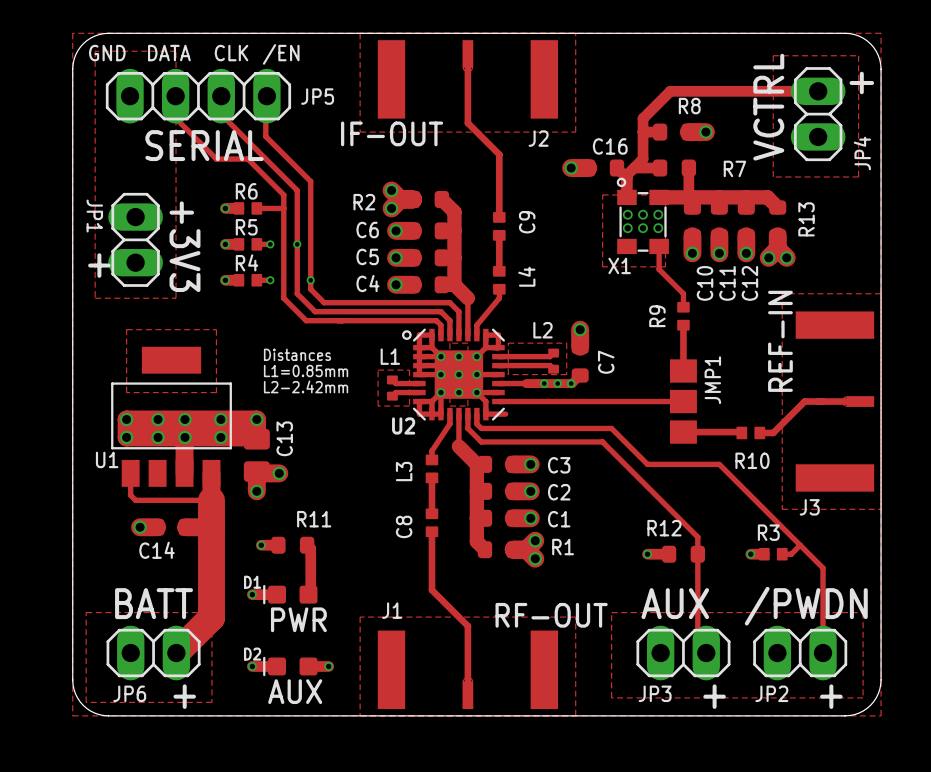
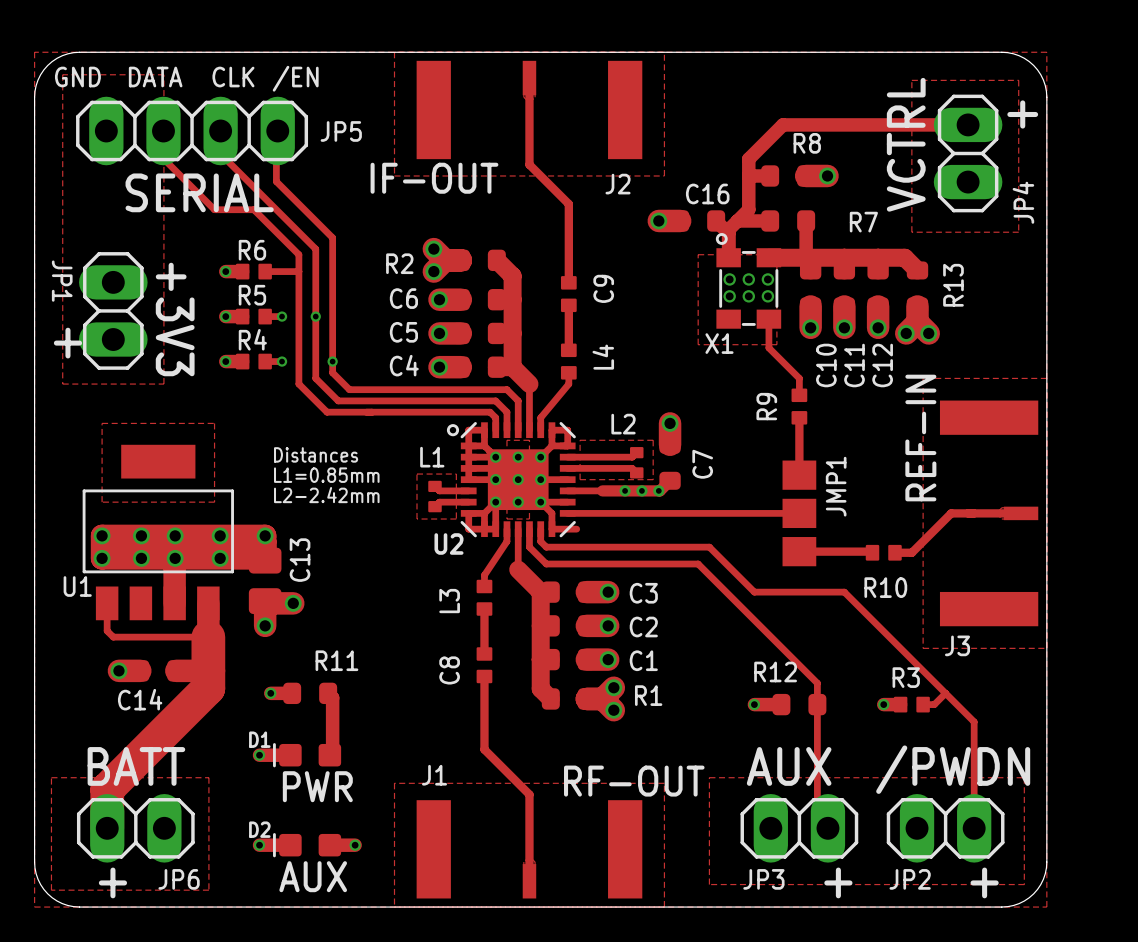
track: (211, 541) (211, 617) (176, 653) -> (208, 688) (107, 789) (107, 828)
JP6 name position: JP6 (129, 693) -> JP6 (179, 879)
text position: + (184, 696) -> + (112, 882)

